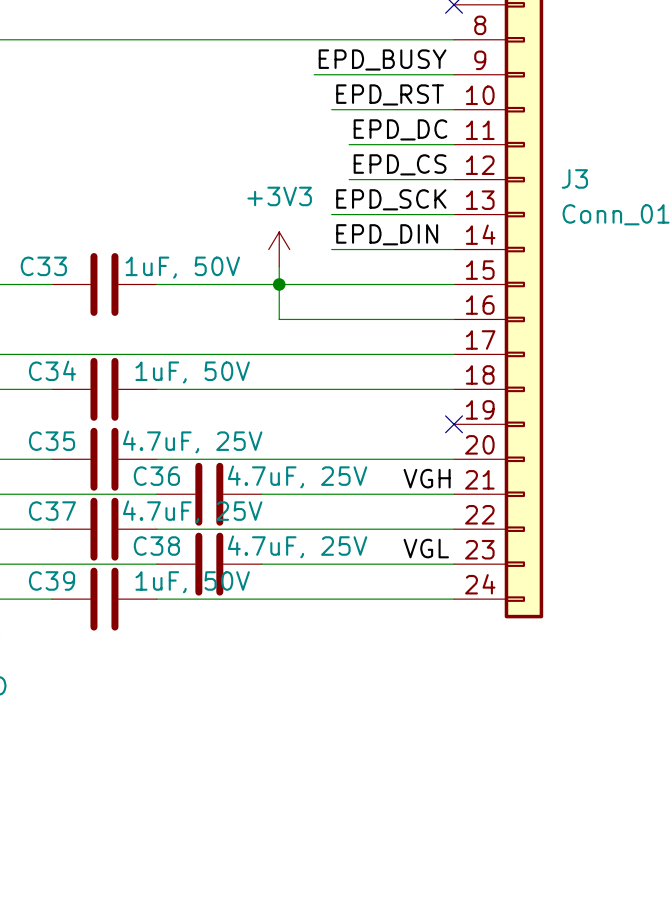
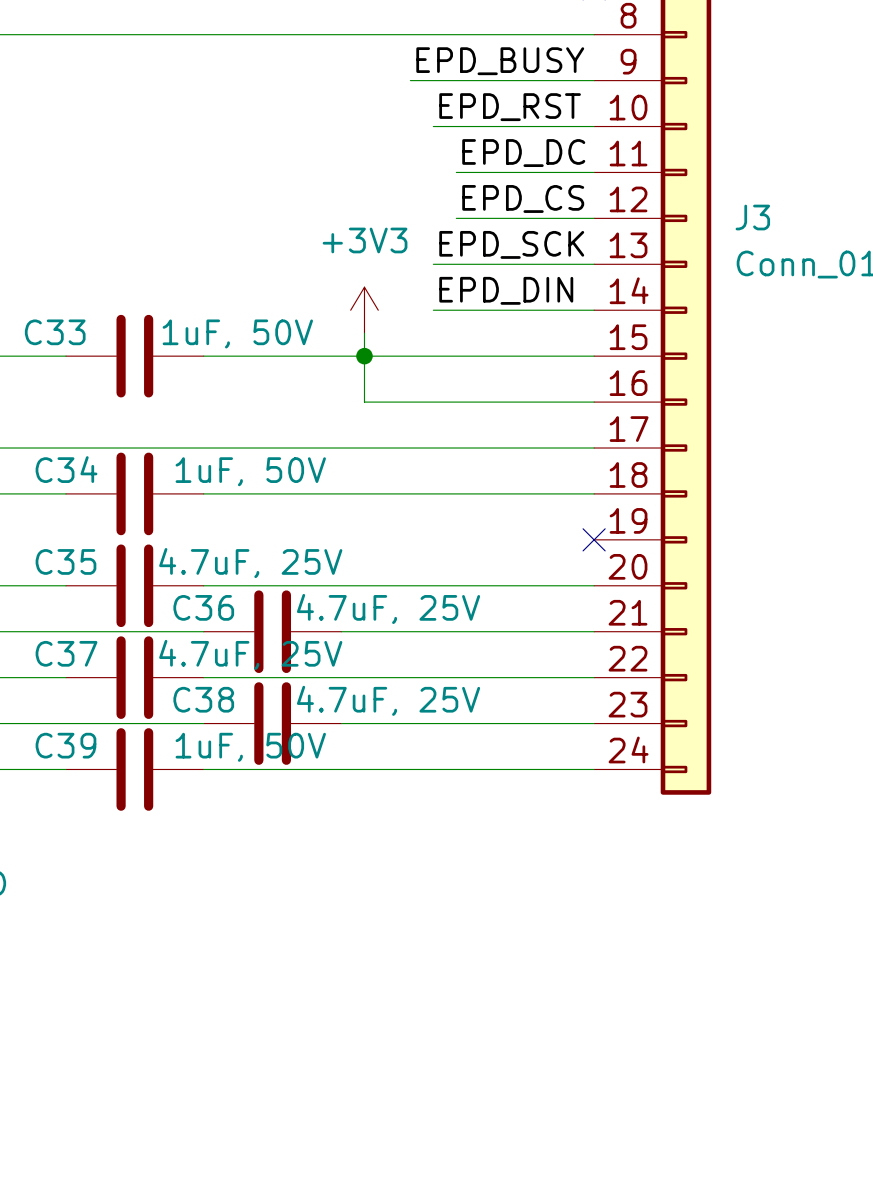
label: VGH (427, 478) -> none
label: VGL (426, 548) -> none

